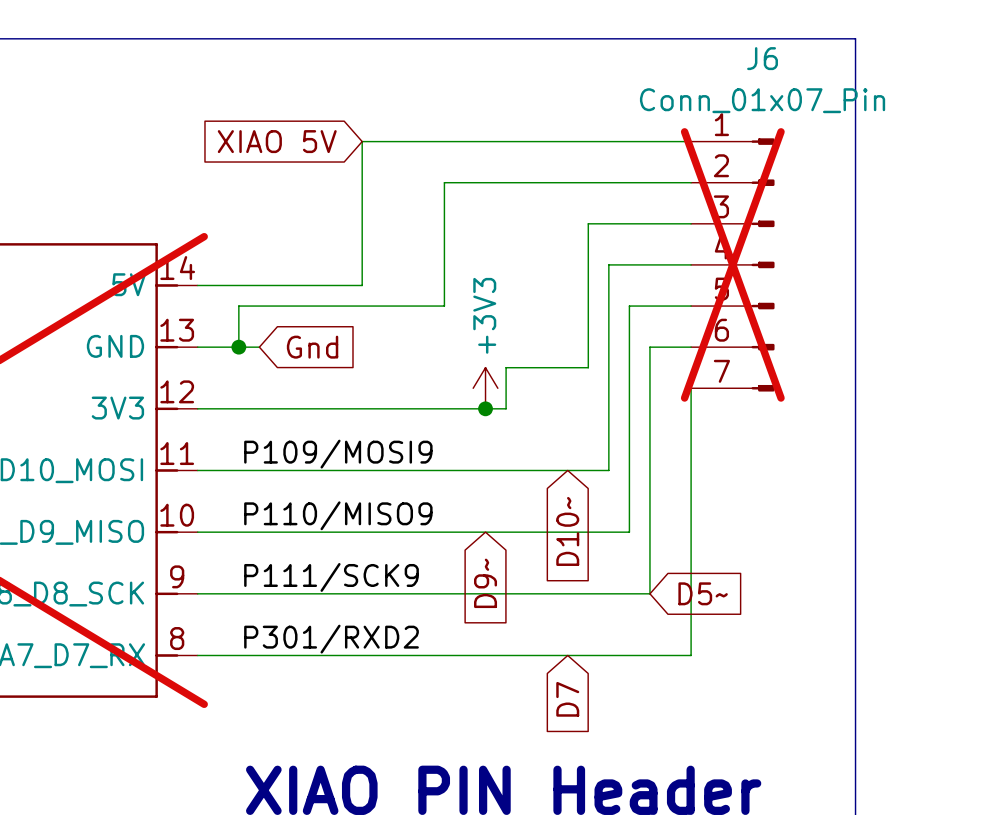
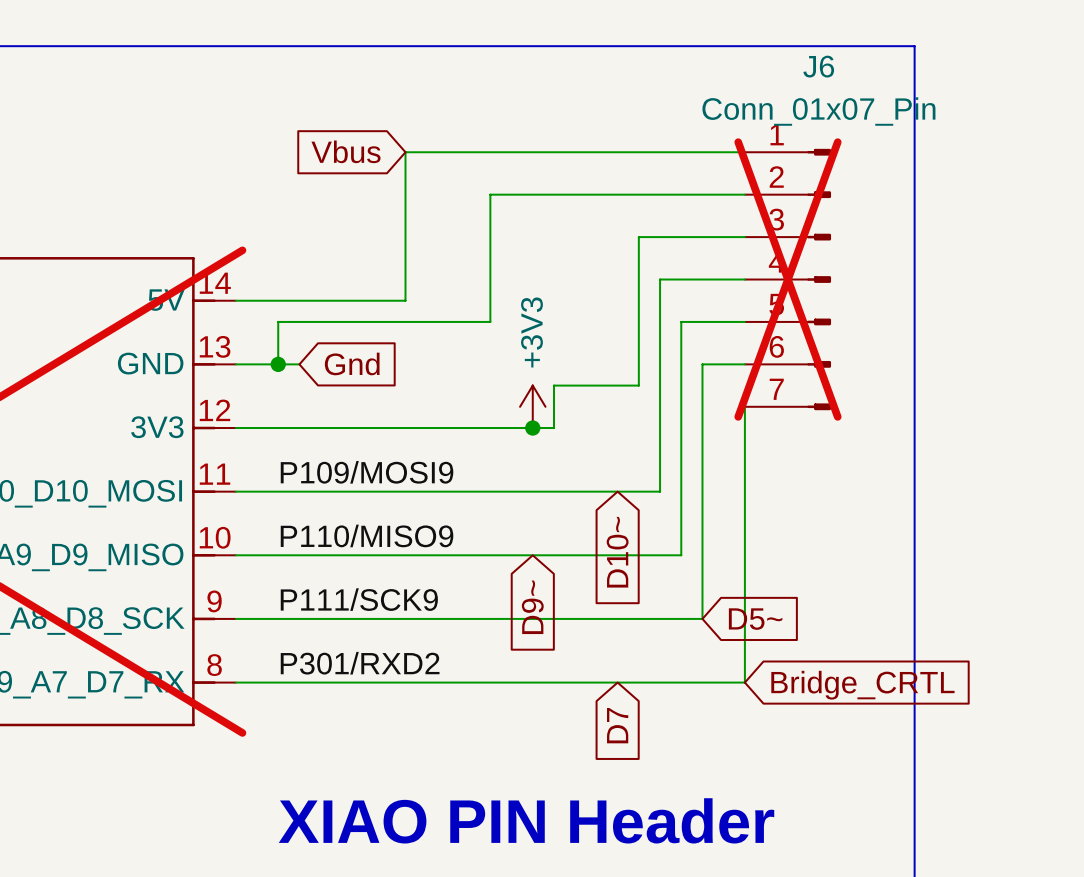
global label: XIAO 5V (277, 141) -> Vbus (346, 151)
global label: none -> Bridge_CRTL (862, 685)

